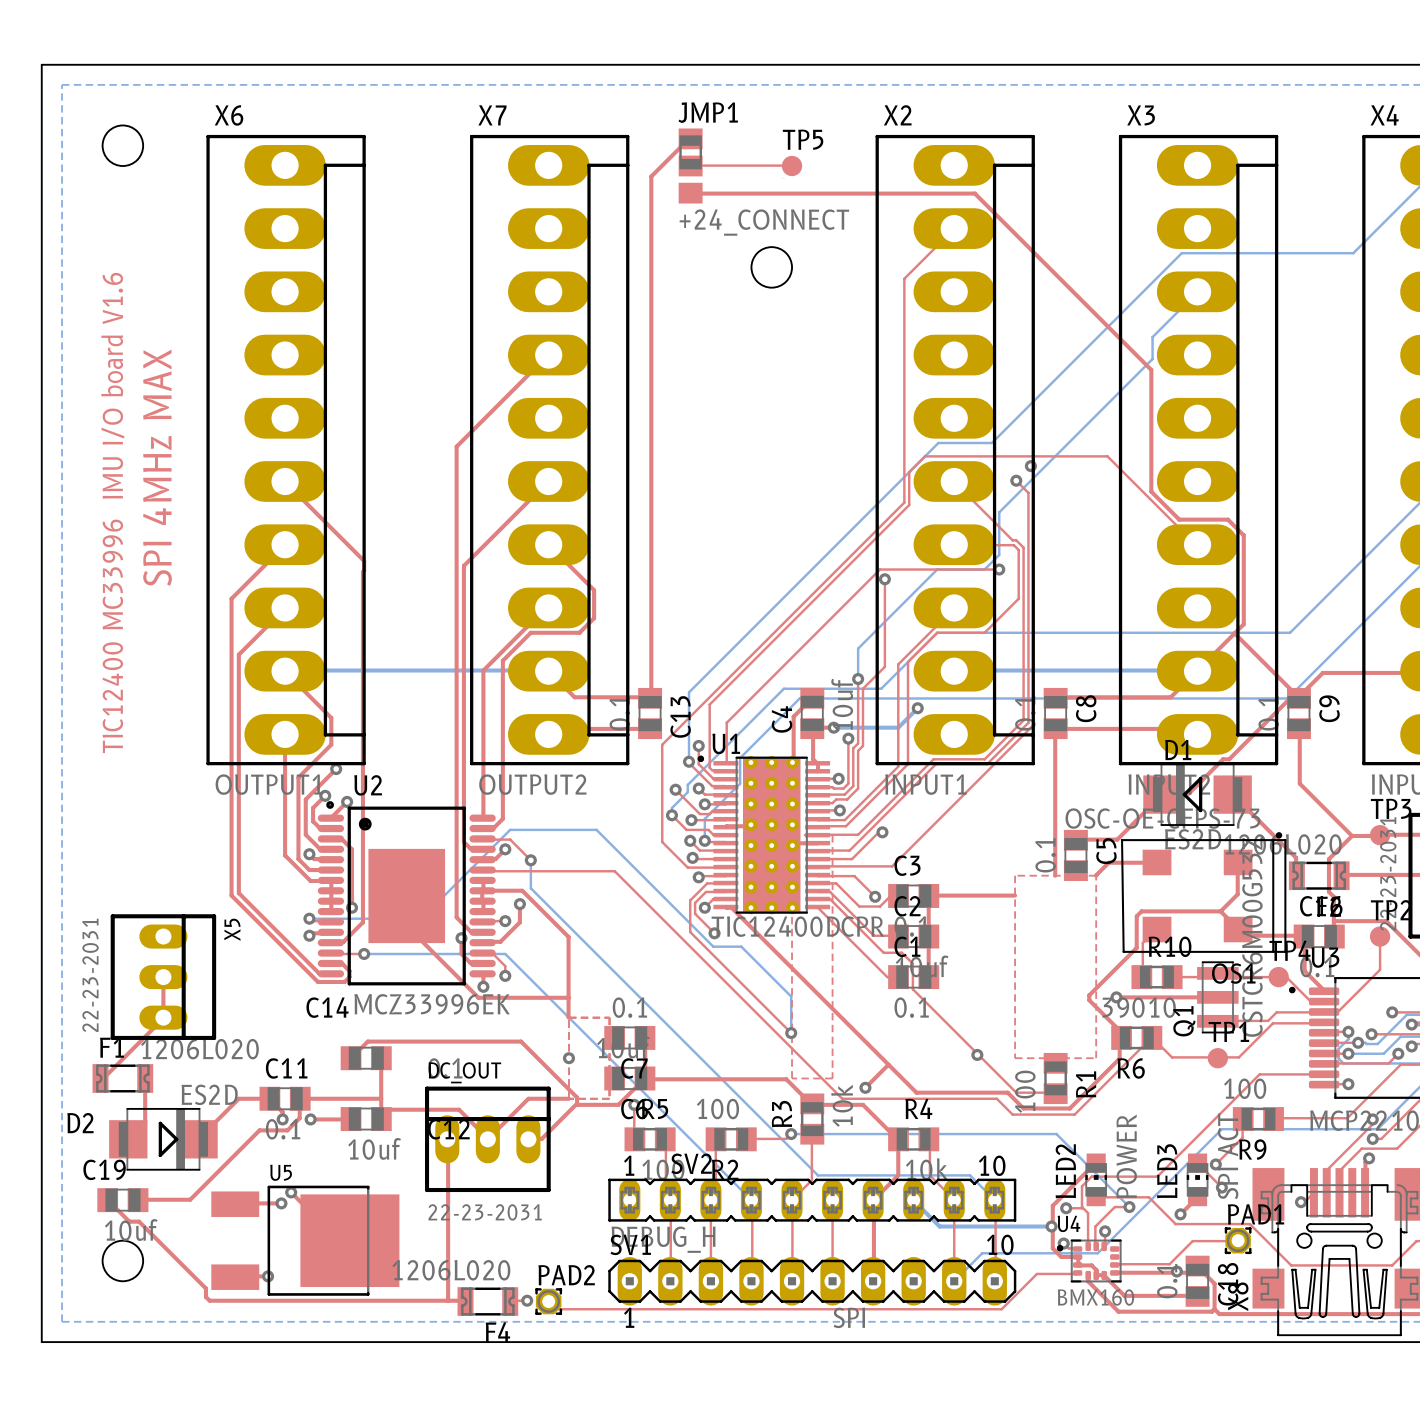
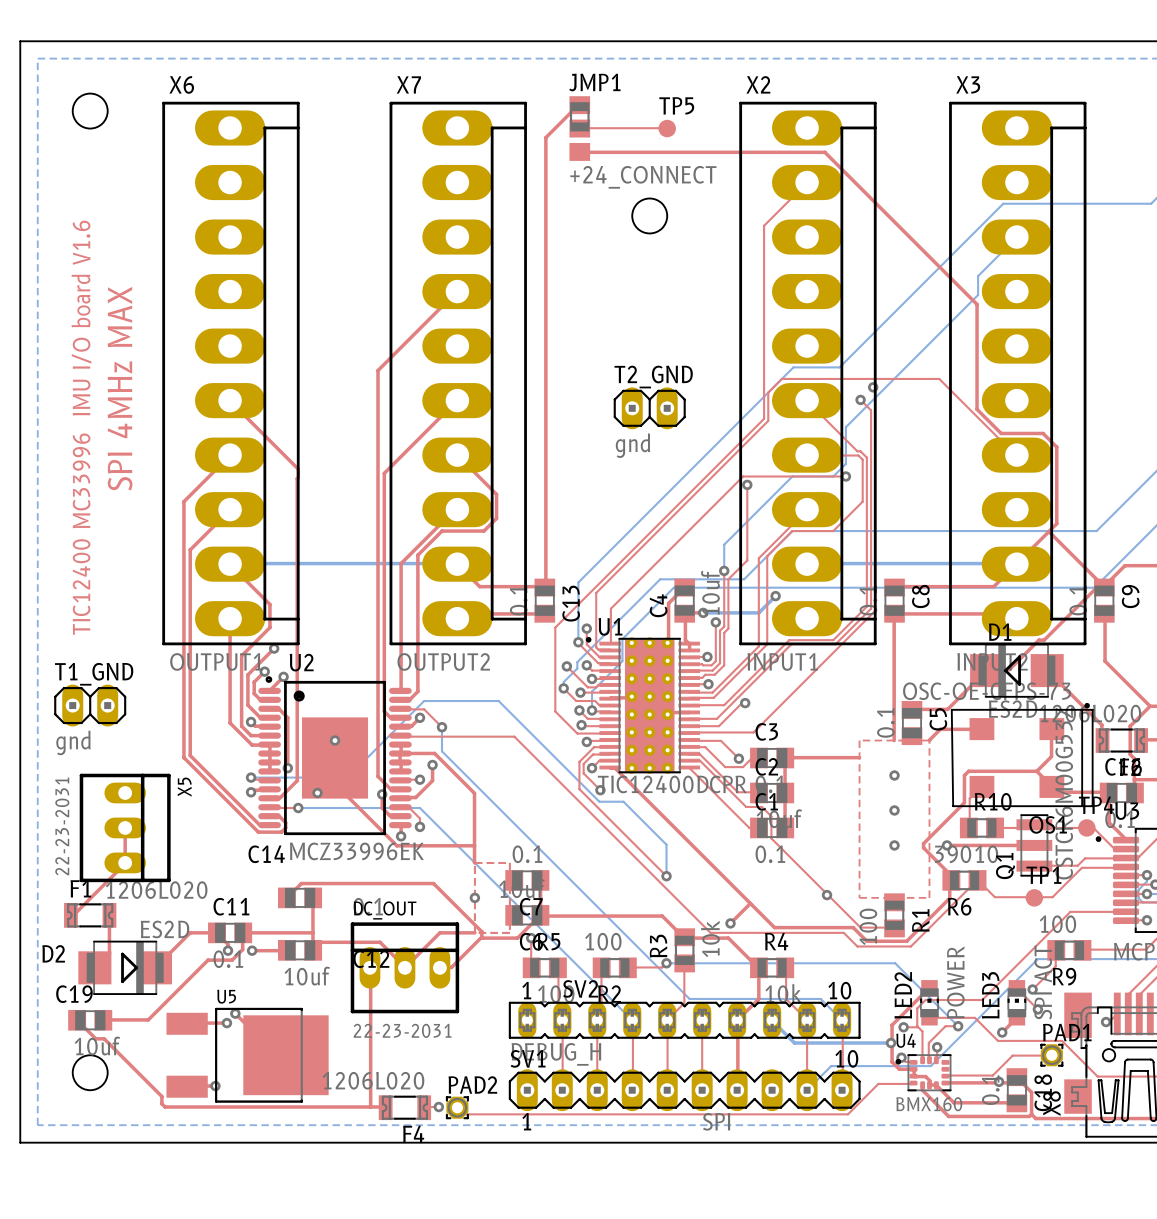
T2_GND: none -> gnd (649, 408)
T1_GND: none -> gnd (90, 705)
top zone outline: (792, 835) (832, 835) (832, 1078) (792, 1078) (792, 835) -> none
via: none -> (335, 740)
via: none -> (894, 775)
via: none -> (317, 792)
via: none -> (894, 810)
via: none -> (894, 845)

